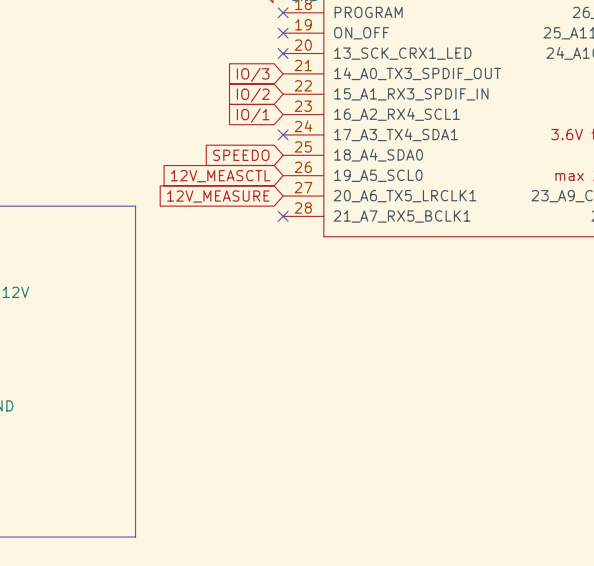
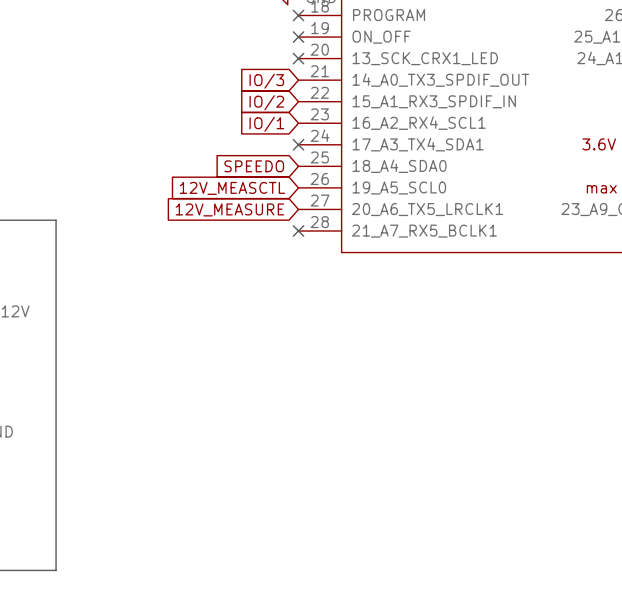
line: (54, 206) (135, 206) (135, 537) (54, 537) -> (56, 220) (56, 570)

